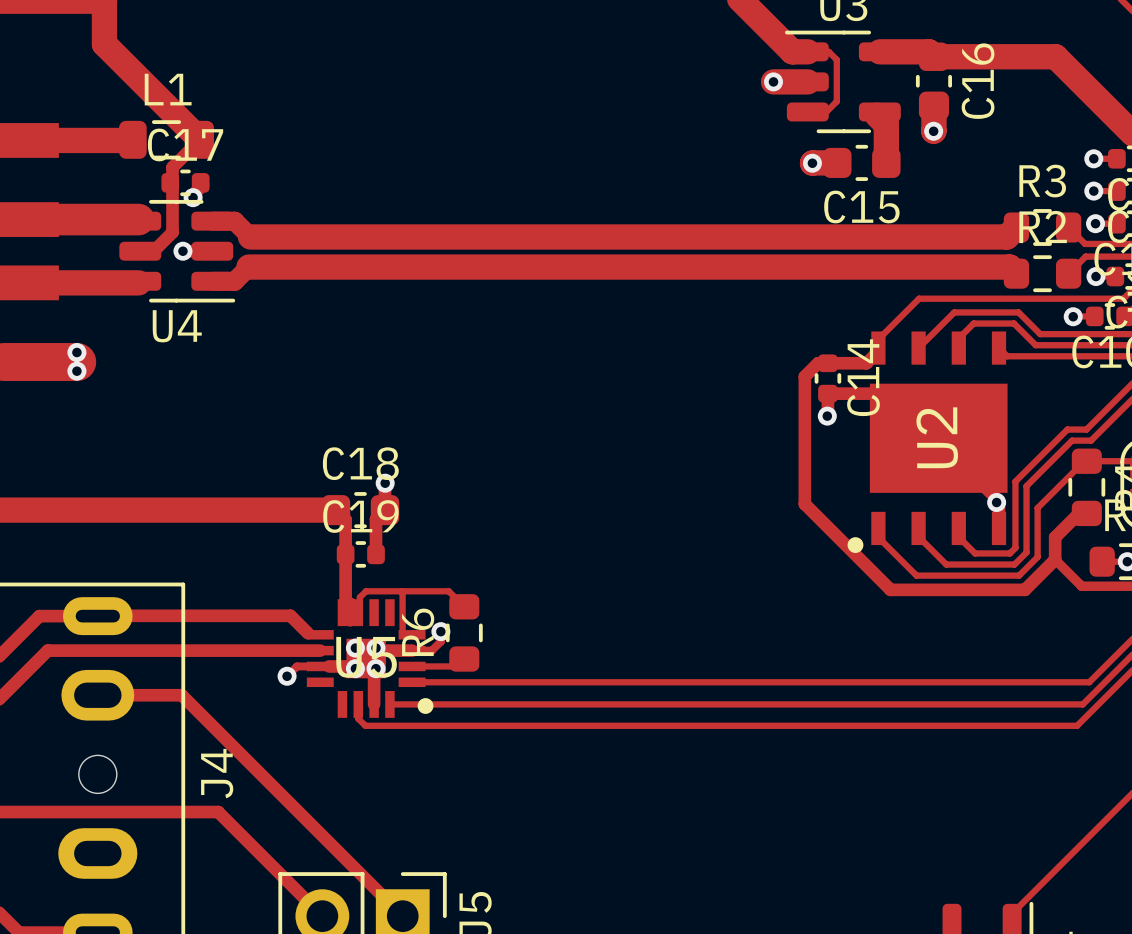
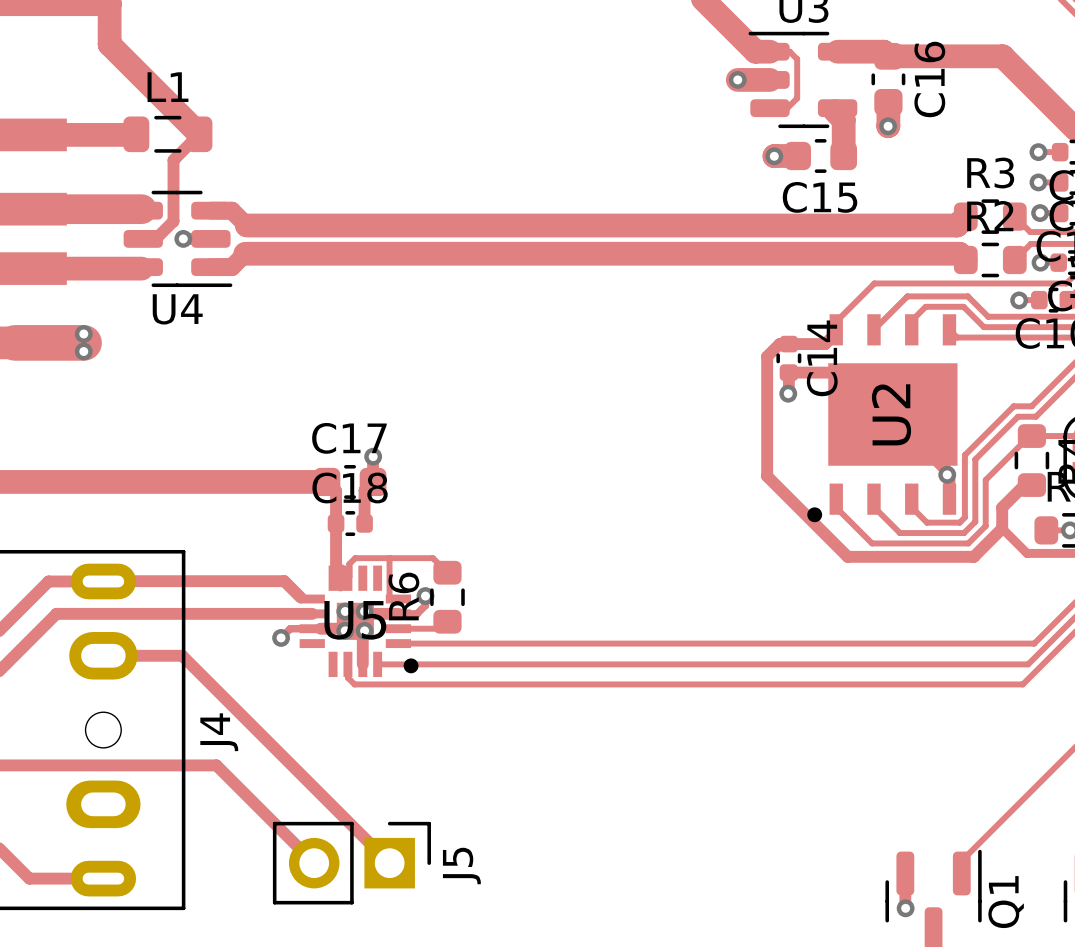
C17: (185, 182) -> none
via: (193, 197) -> none
C18 name: C18 (360, 463) -> C17 (349, 438)
C19 name: C19 (360, 516) -> C18 (350, 487)

